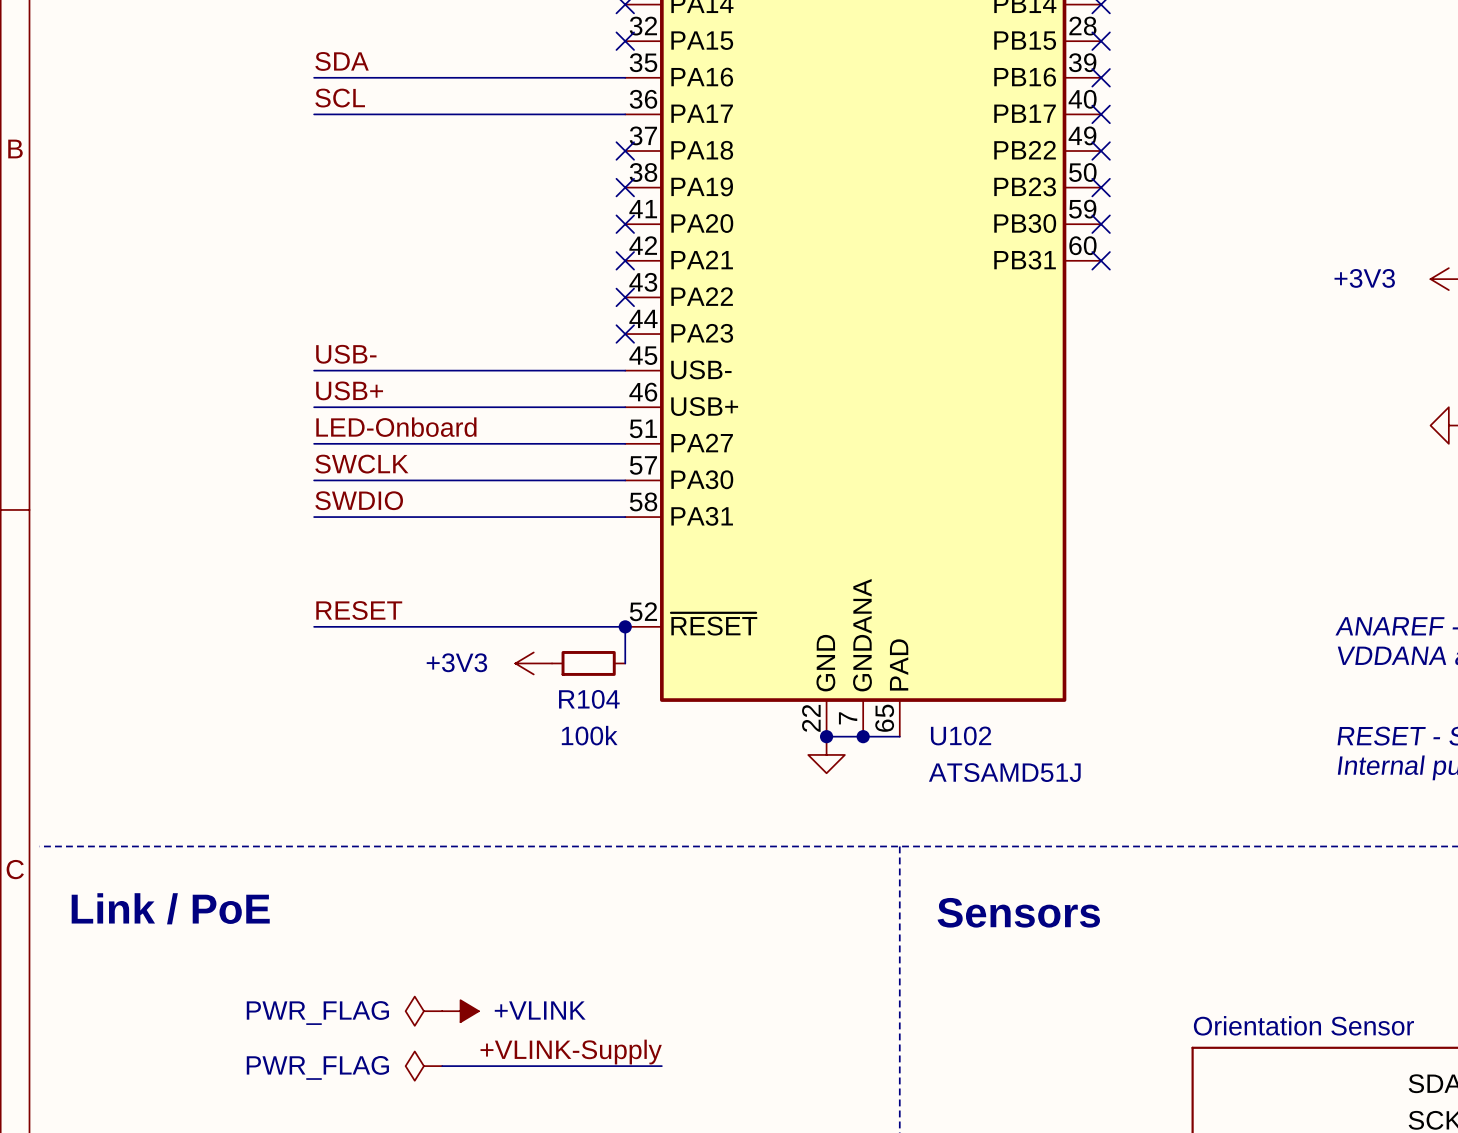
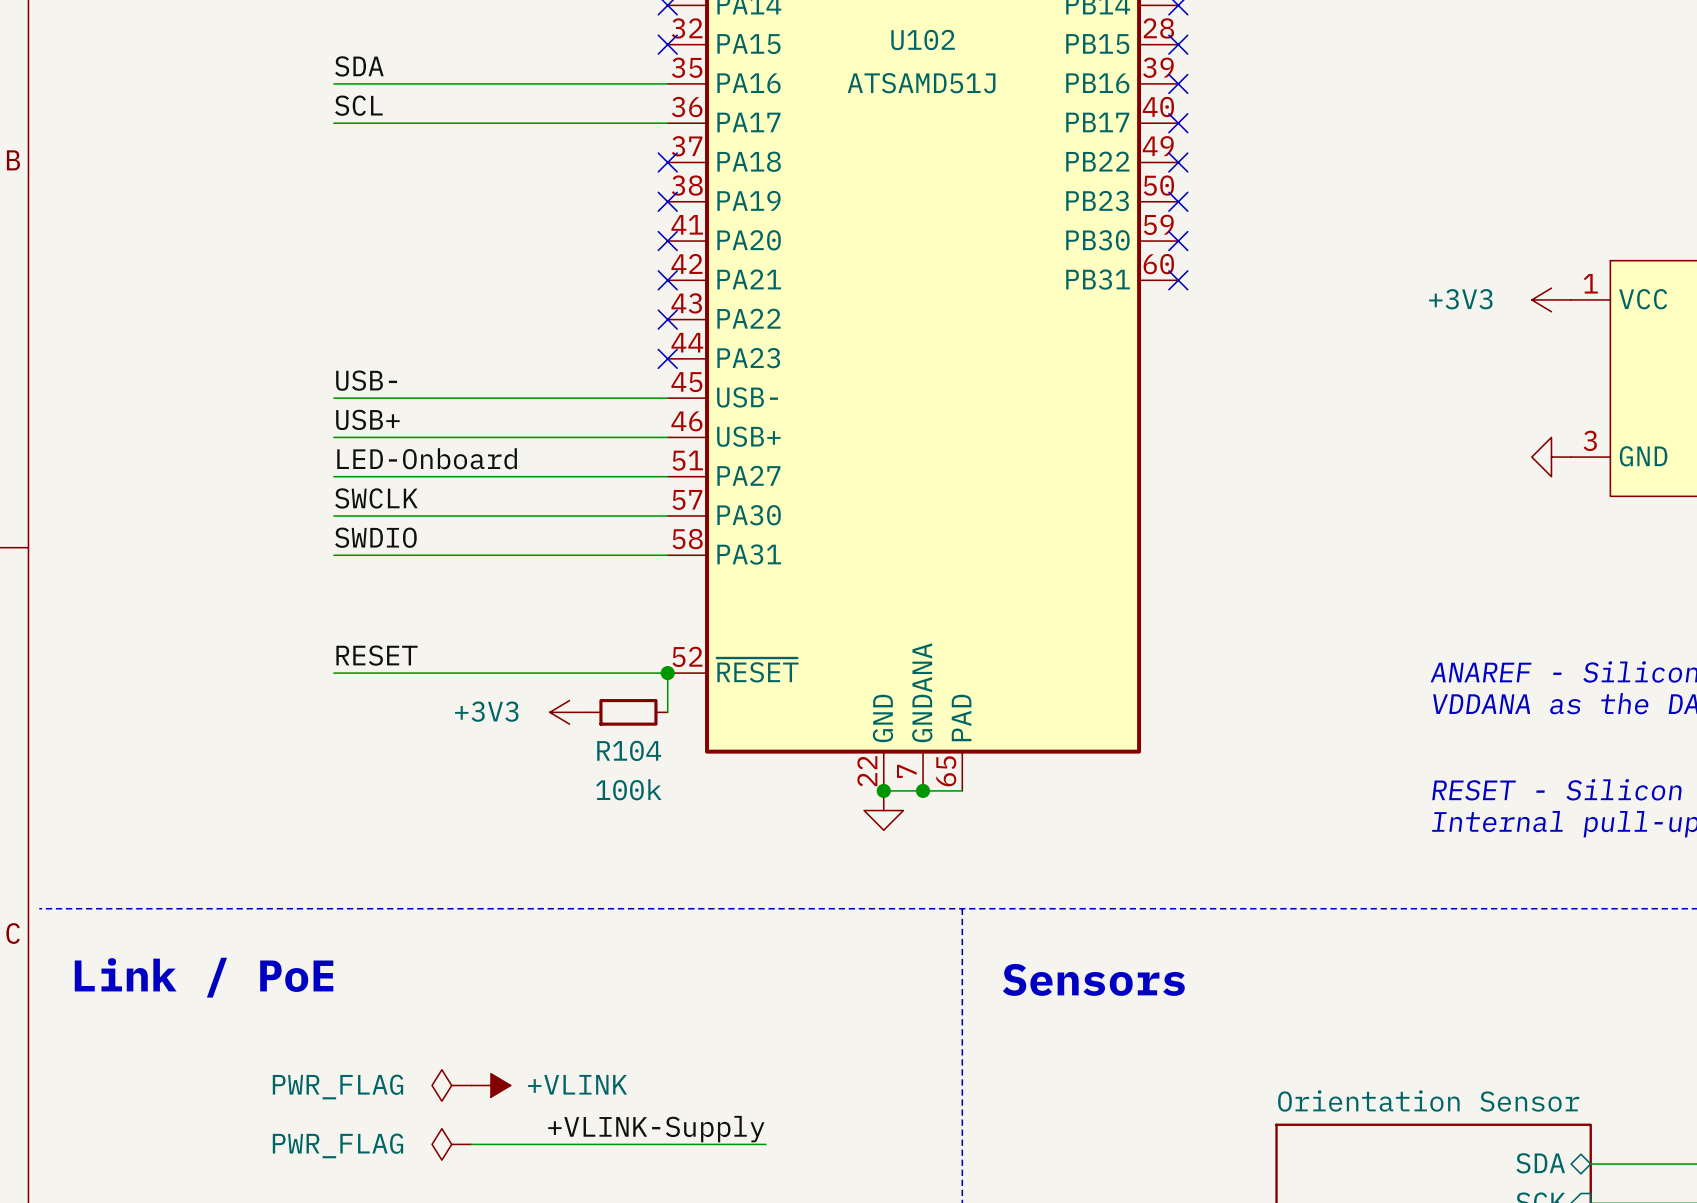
U102 name position: U102 (961, 735) -> U102 (923, 39)
U102 value position: ATSAMD51J (1004, 772) -> ATSAMD51J (921, 83)
label position: +VLINK-Supply (571, 1052) -> +VLINK-Supply (656, 1129)
wire: none -> (707, 1144) (765, 1144)

